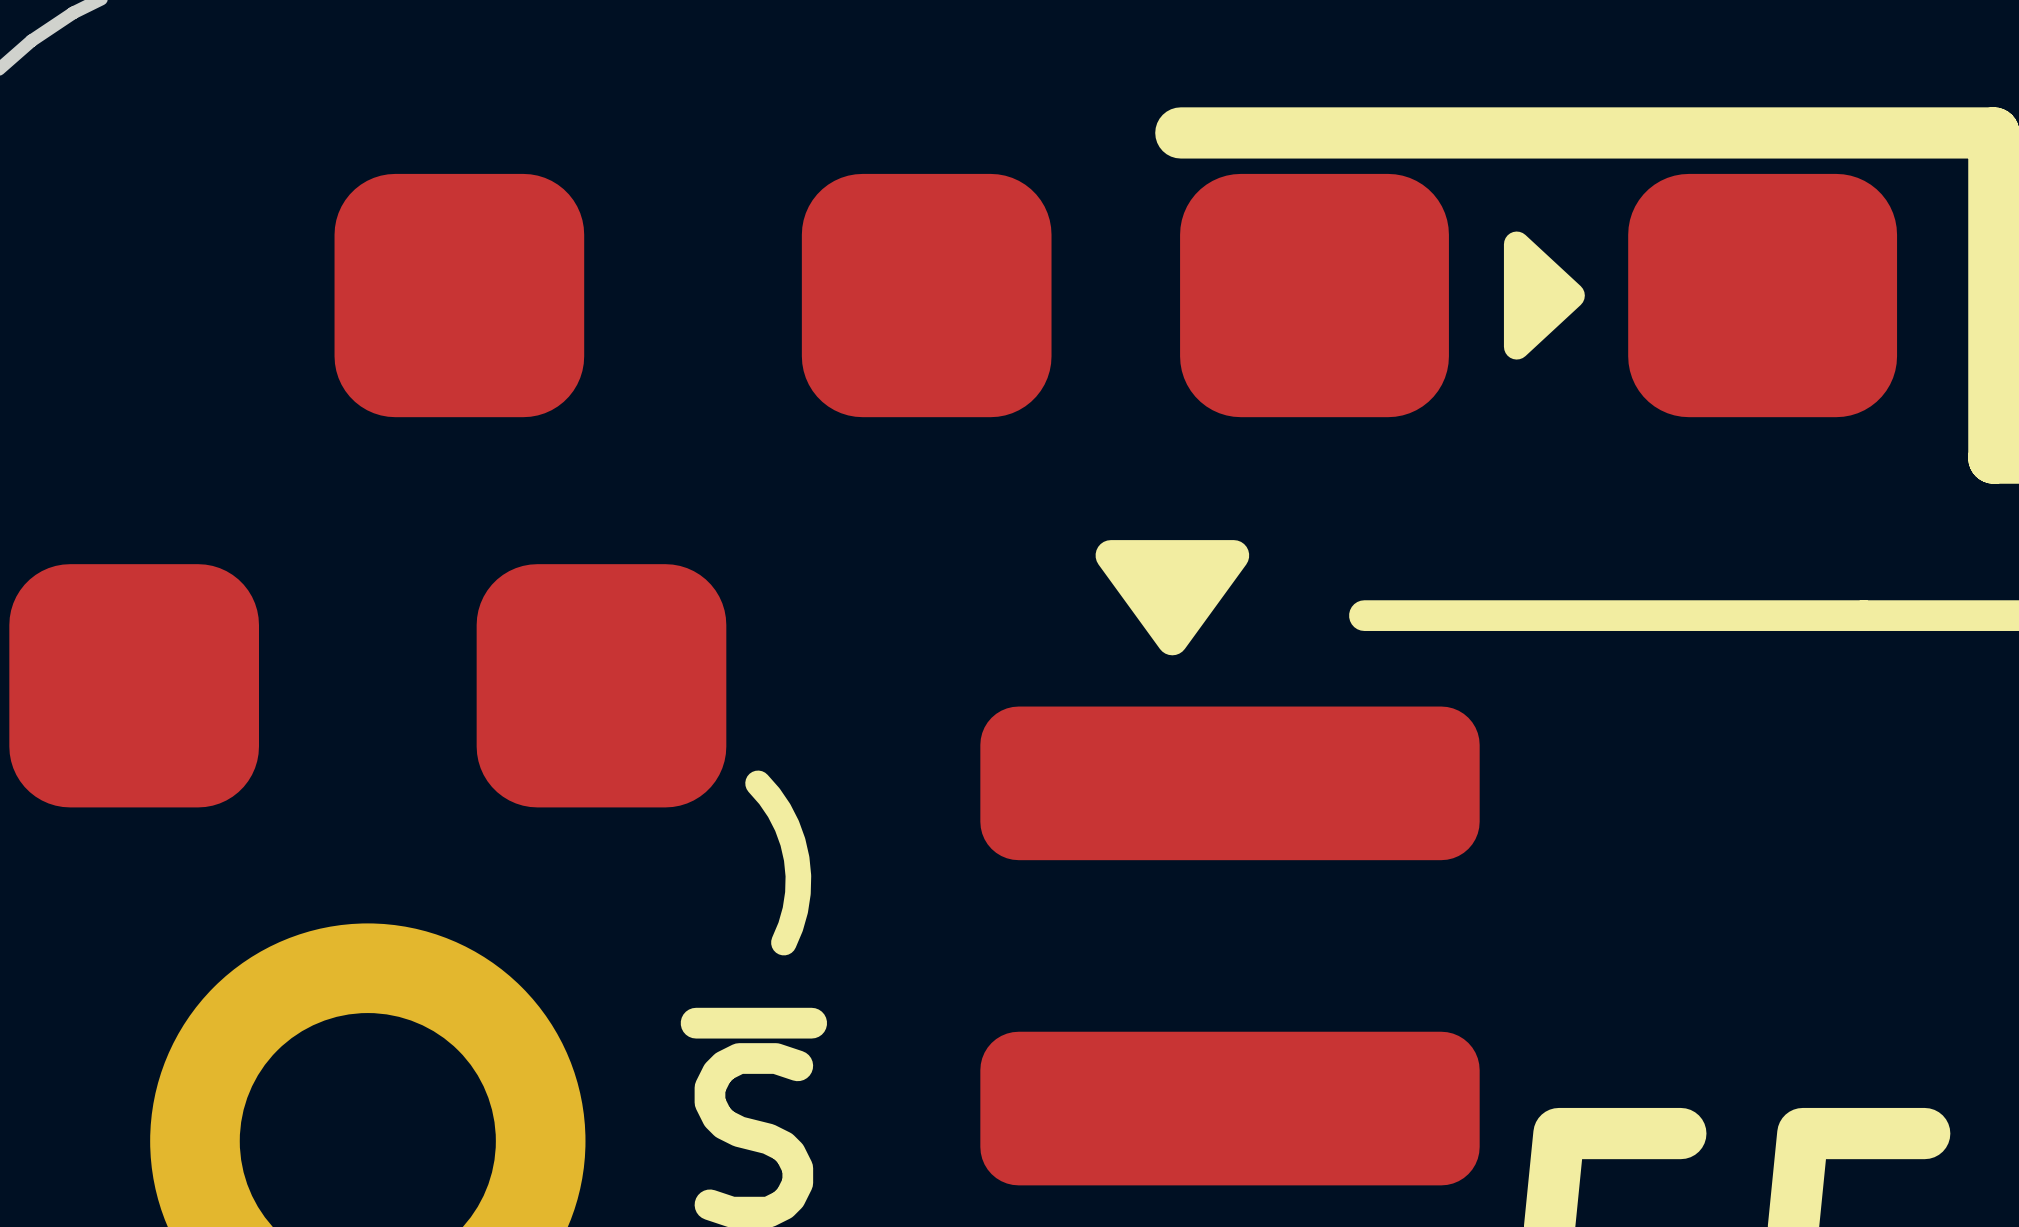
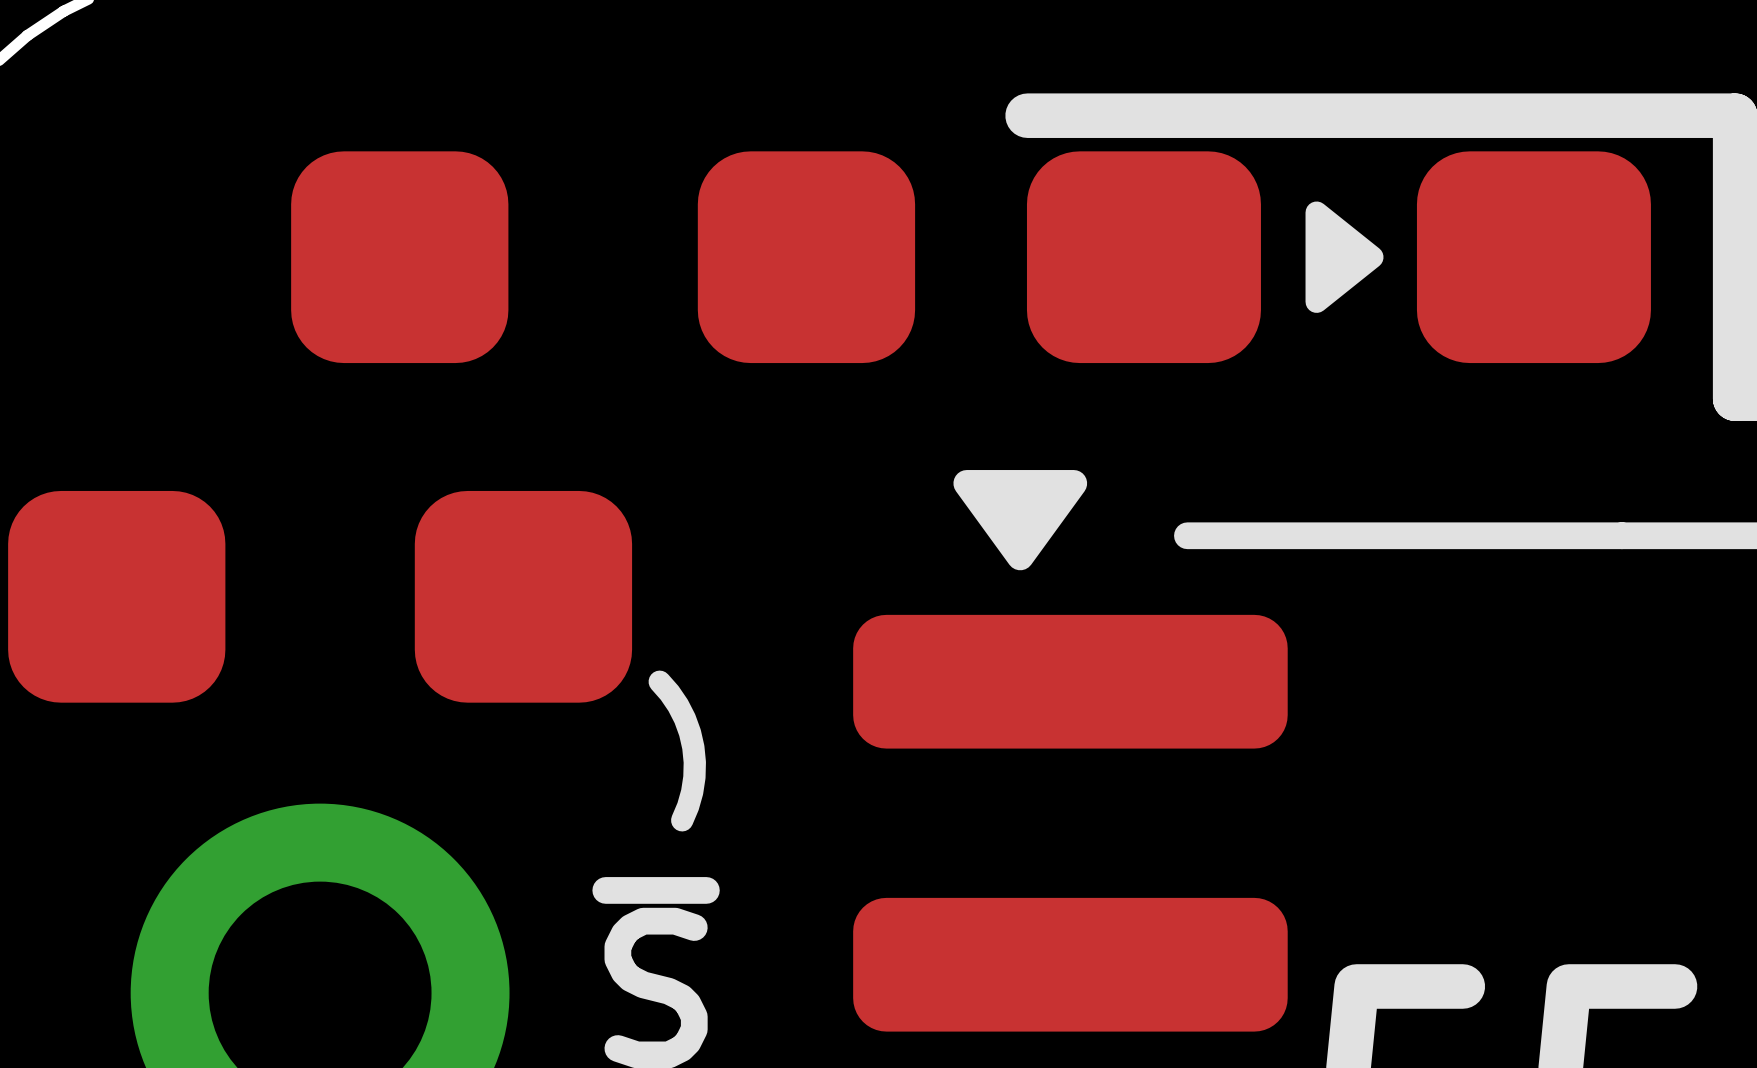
part footprint: [1180, 173, 1898, 418] -> [1026, 151, 1651, 364]

